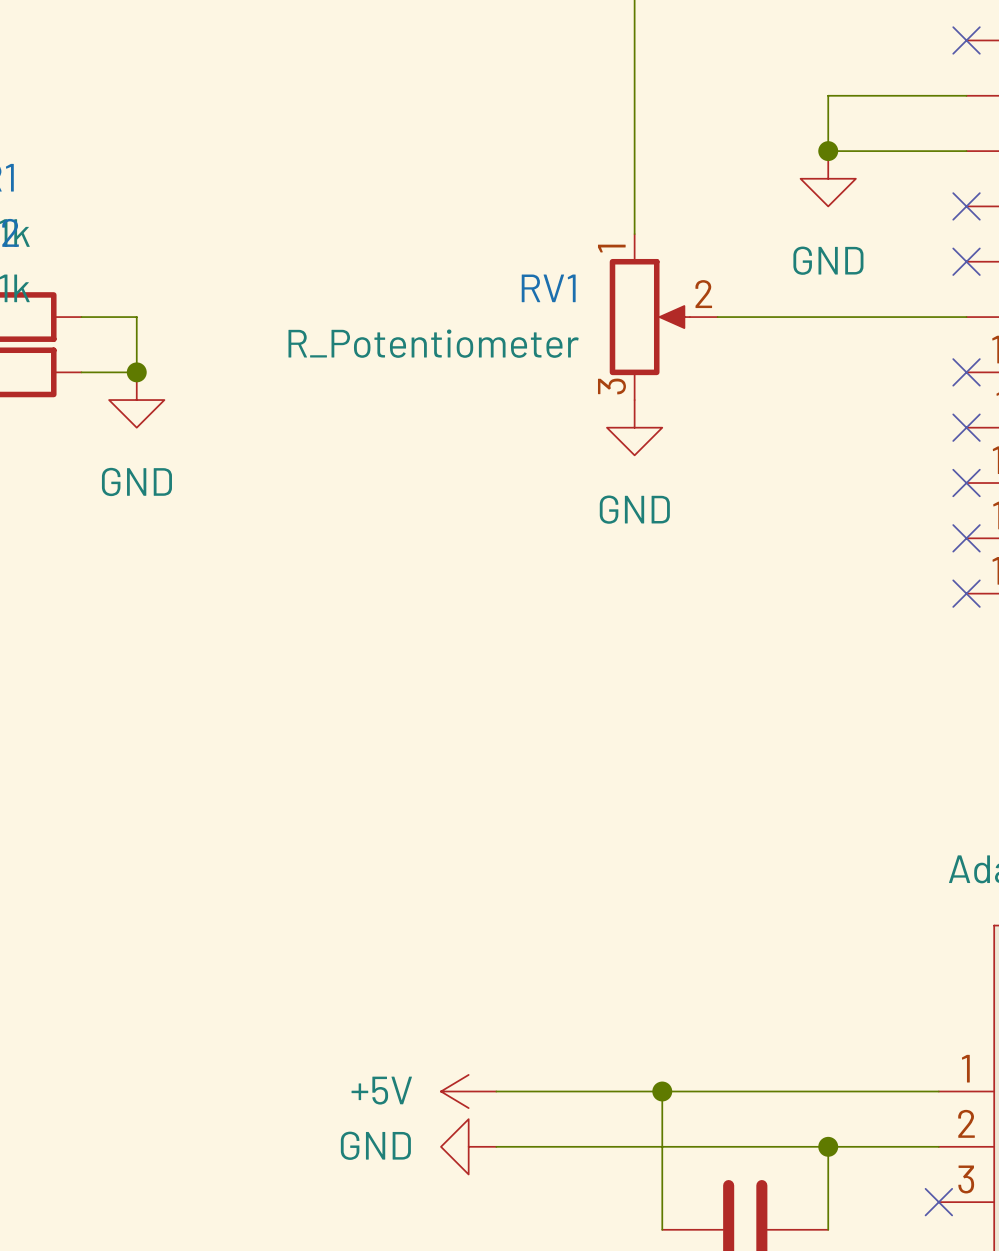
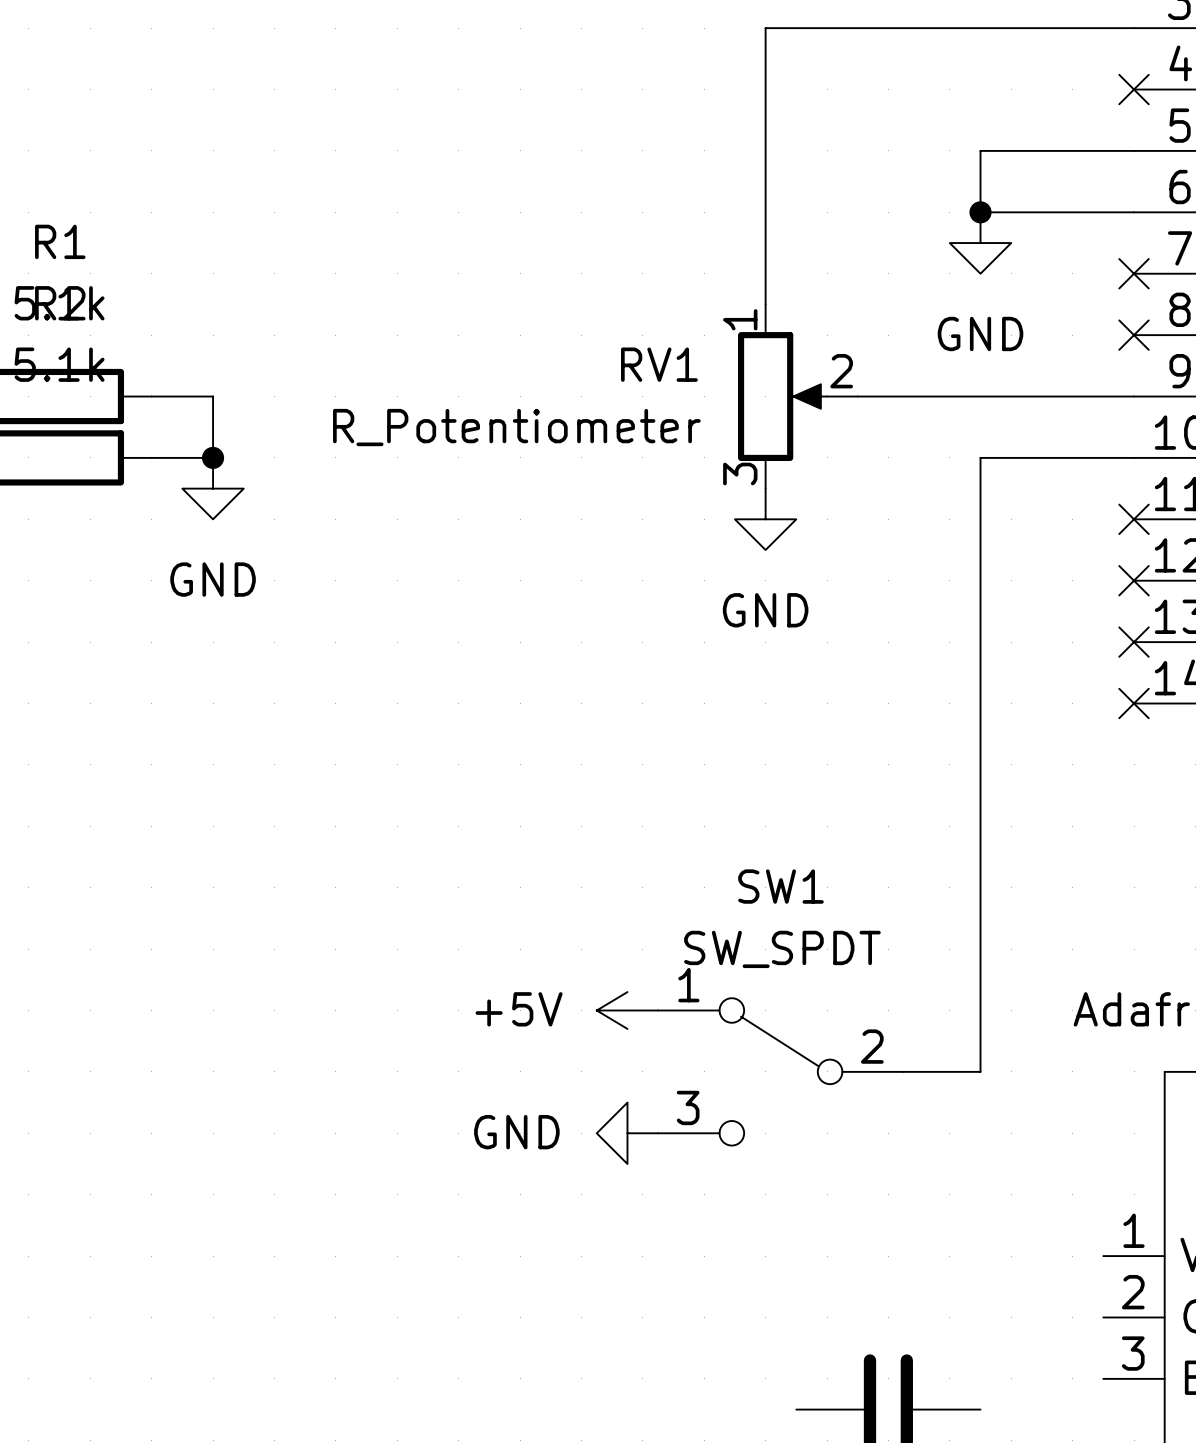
wire: none -> (1134, 457) (980, 457) (980, 1071) (903, 1071)
no-connect mark: (966, 372) -> none
SW1: none -> SW_SPDT (780, 1071)
power symbol position: +5V (468, 1091) -> +5V (627, 1010)
wire: (496, 1091) (938, 1091) -> none
wire: (662, 1091) (662, 1229) -> none
junction: (662, 1091) -> none
power symbol position: GND (468, 1146) -> GND (627, 1133)
wire: (496, 1146) (938, 1146) -> none
wire: (828, 1146) (828, 1229) -> none
junction: (828, 1146) -> none
no-connect mark: (938, 1202) -> none

